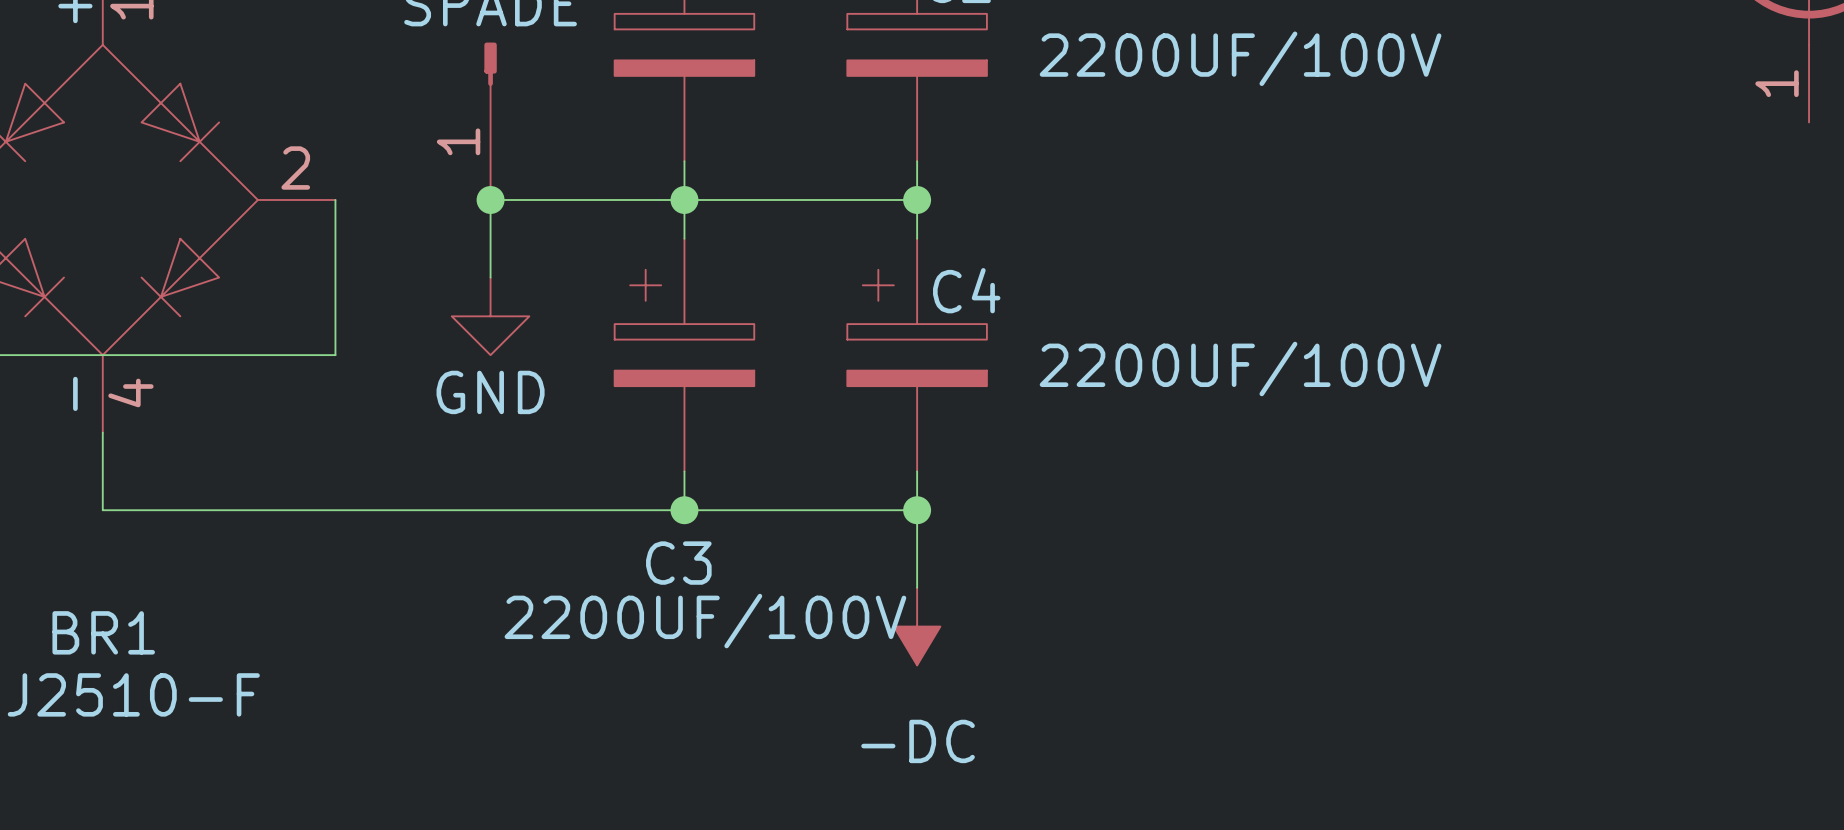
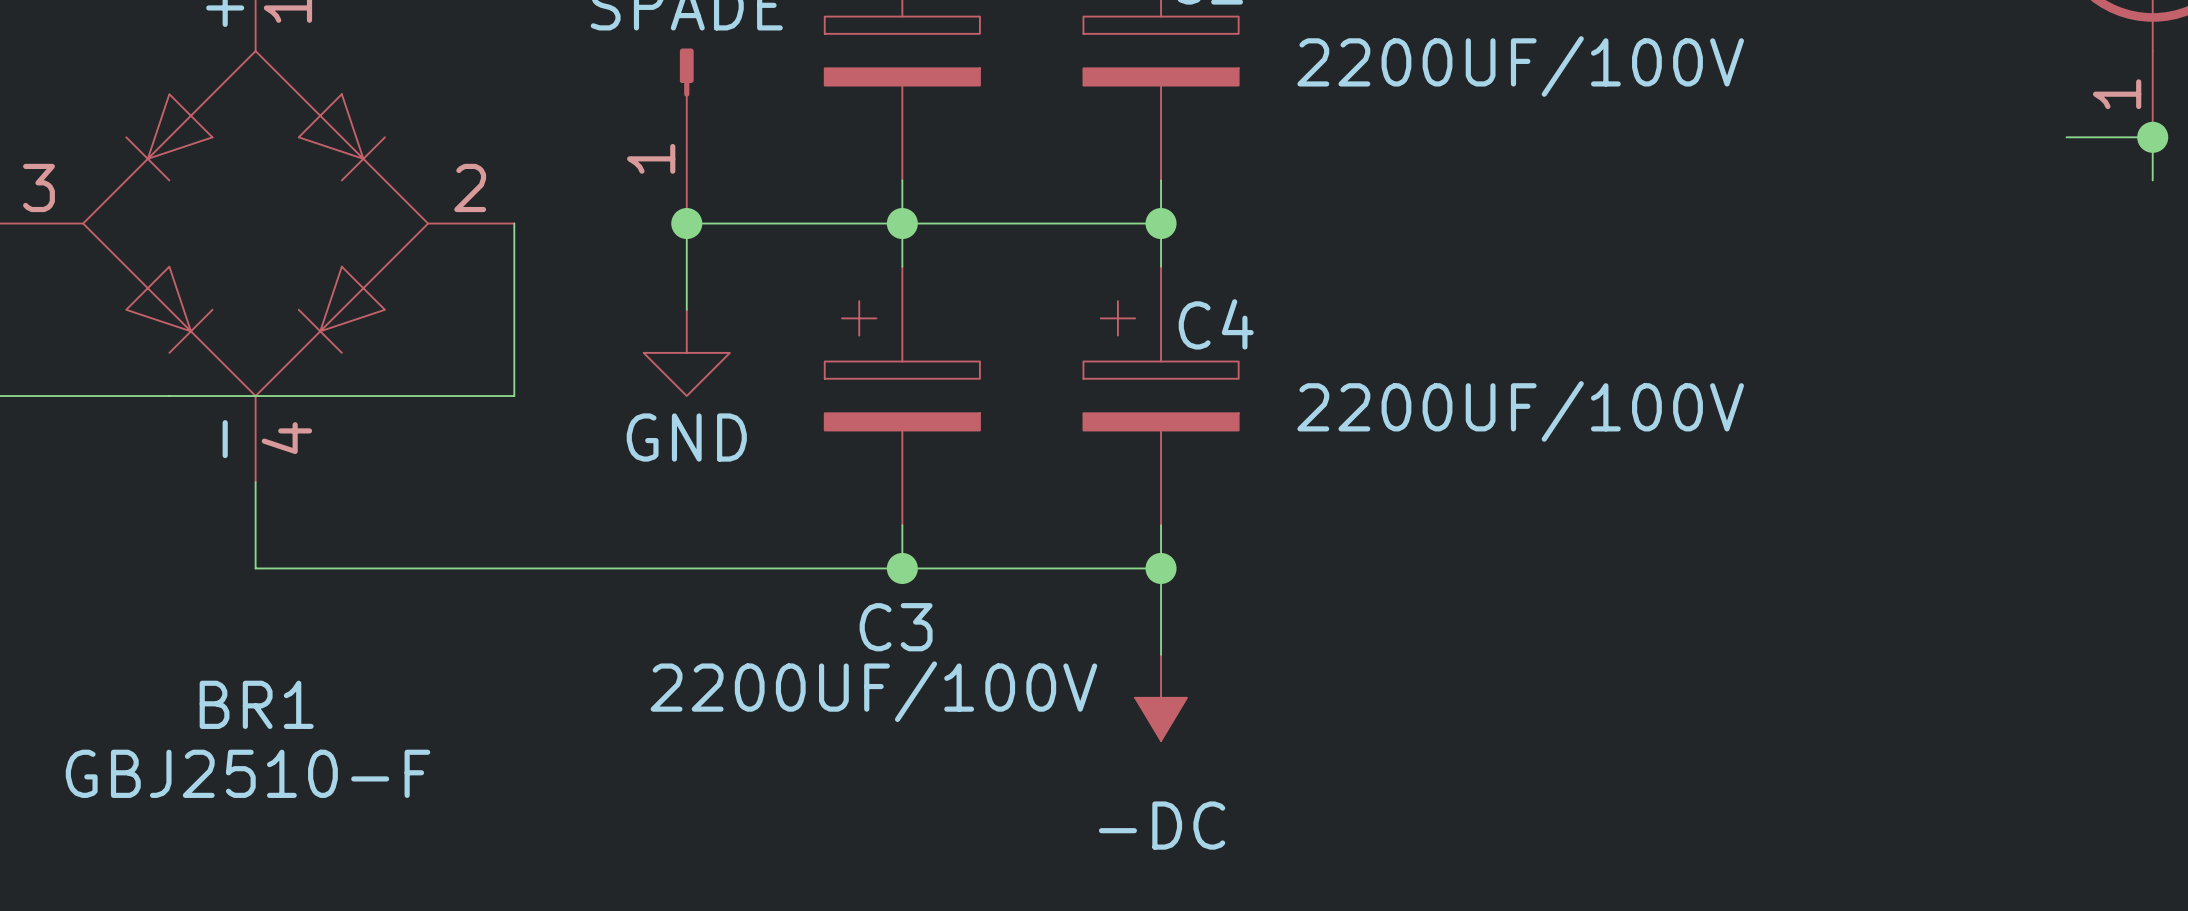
wire: none -> (2066, 137) (2152, 137) (2152, 180)
junction: none -> (2152, 137)
C3 value position: 2200UF/100V (705, 621) -> 2200UF/100V (873, 691)

